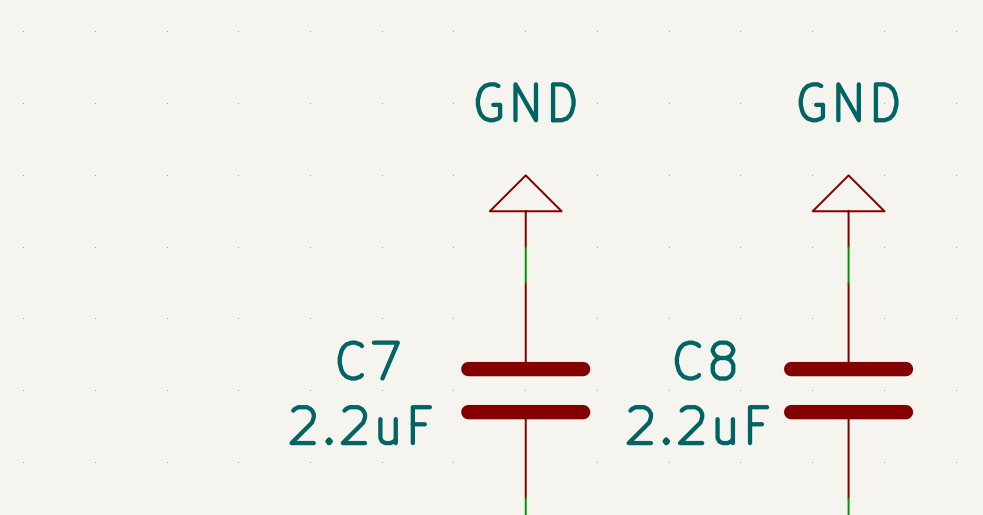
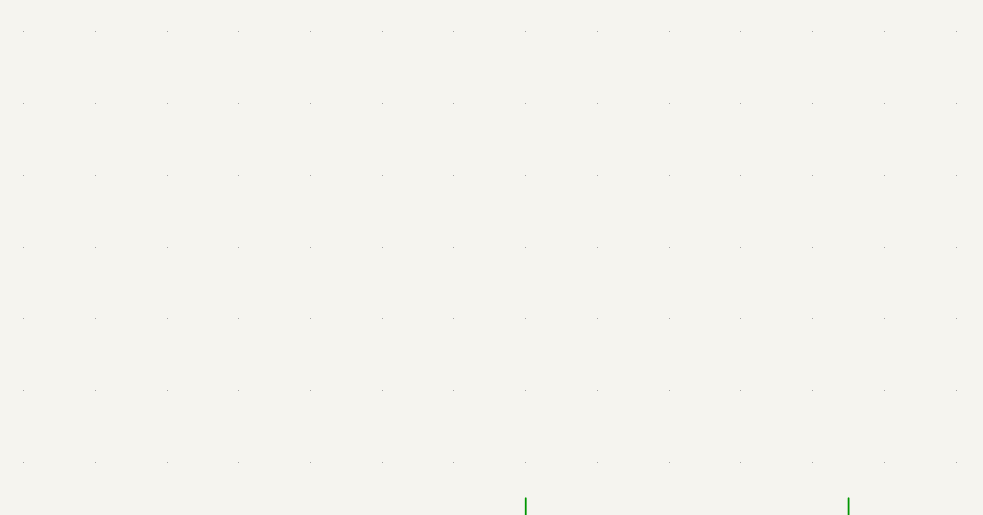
power symbol: GND (525, 211) -> none
power symbol: GND (848, 211) -> none
wire: (525, 247) (525, 282) -> none
wire: (848, 247) (848, 282) -> none
C7: 2.2uF (525, 390) -> none
C8: 2.2uF (848, 390) -> none

